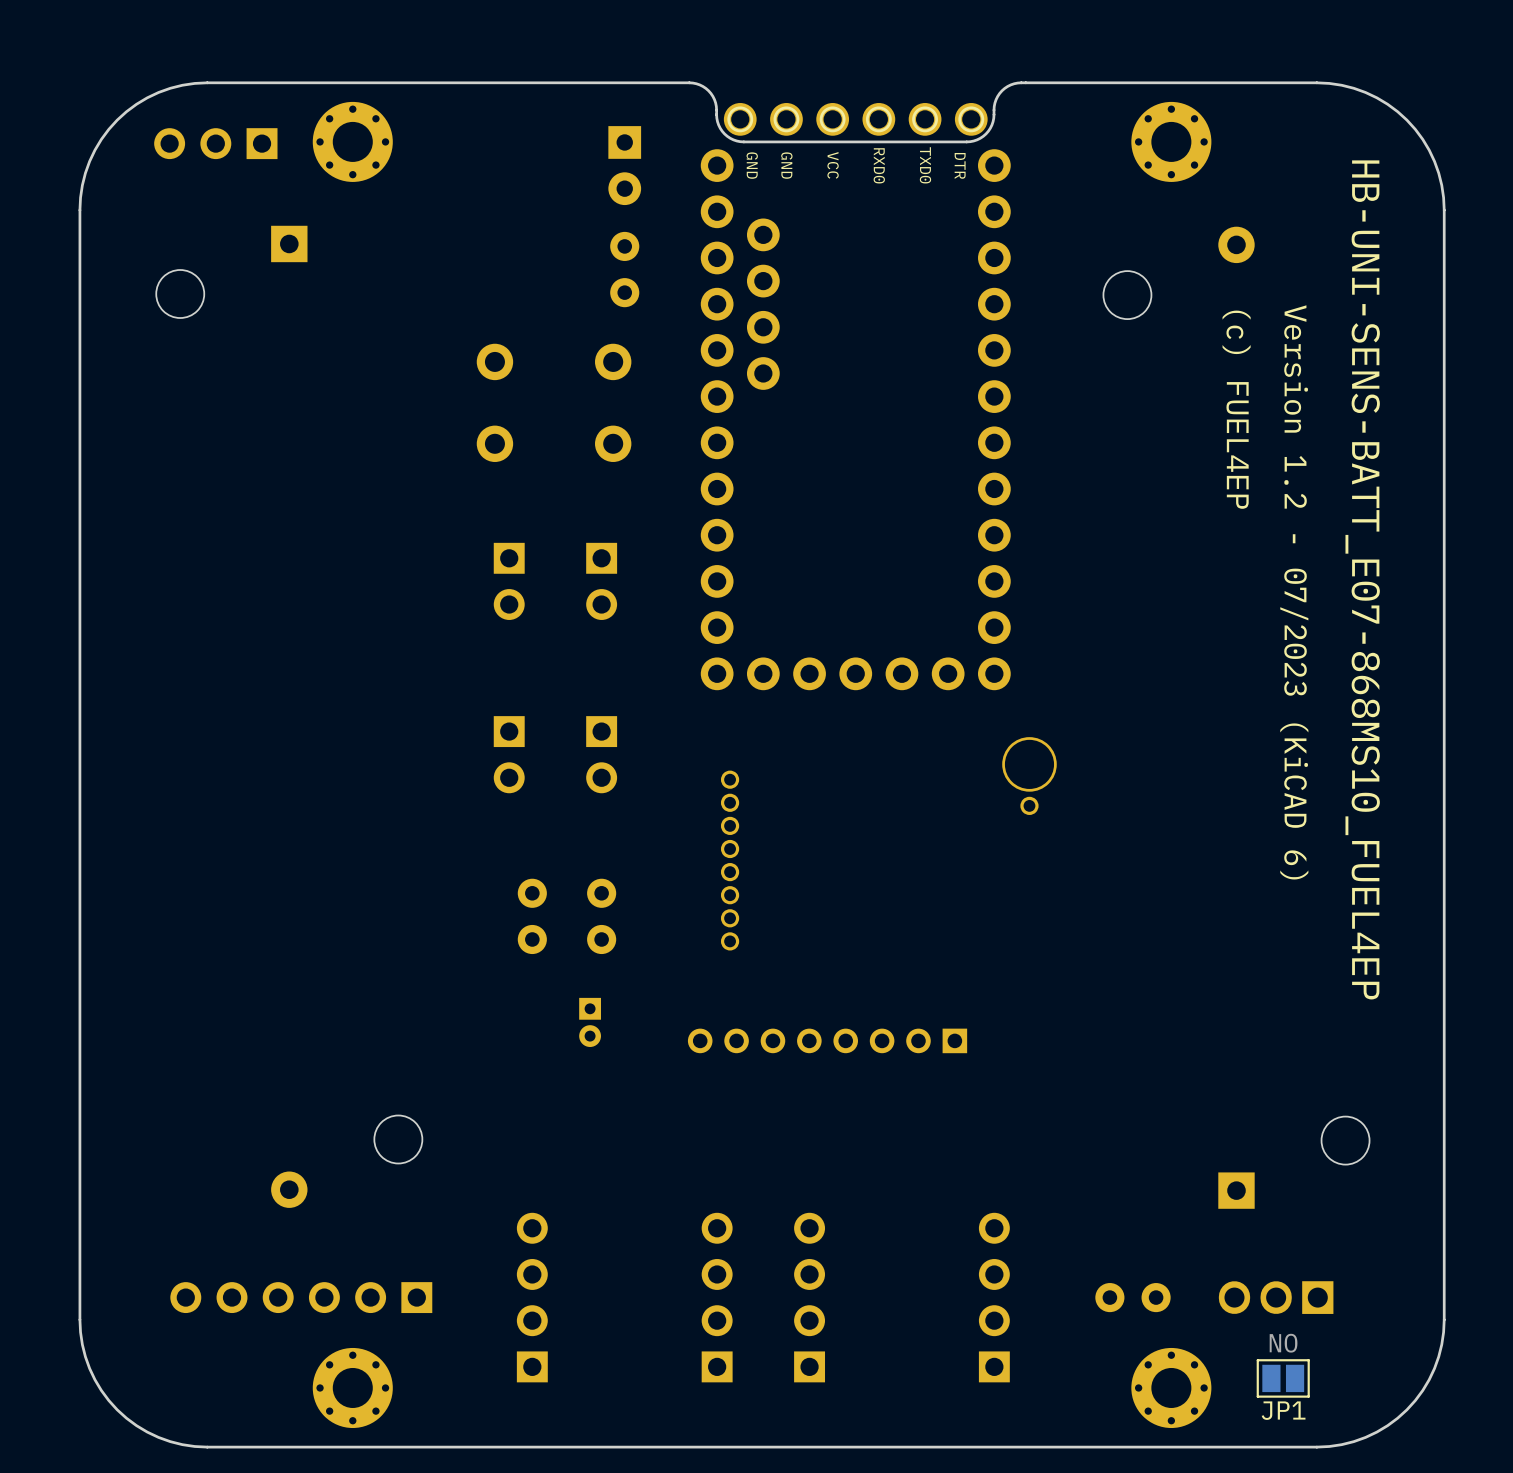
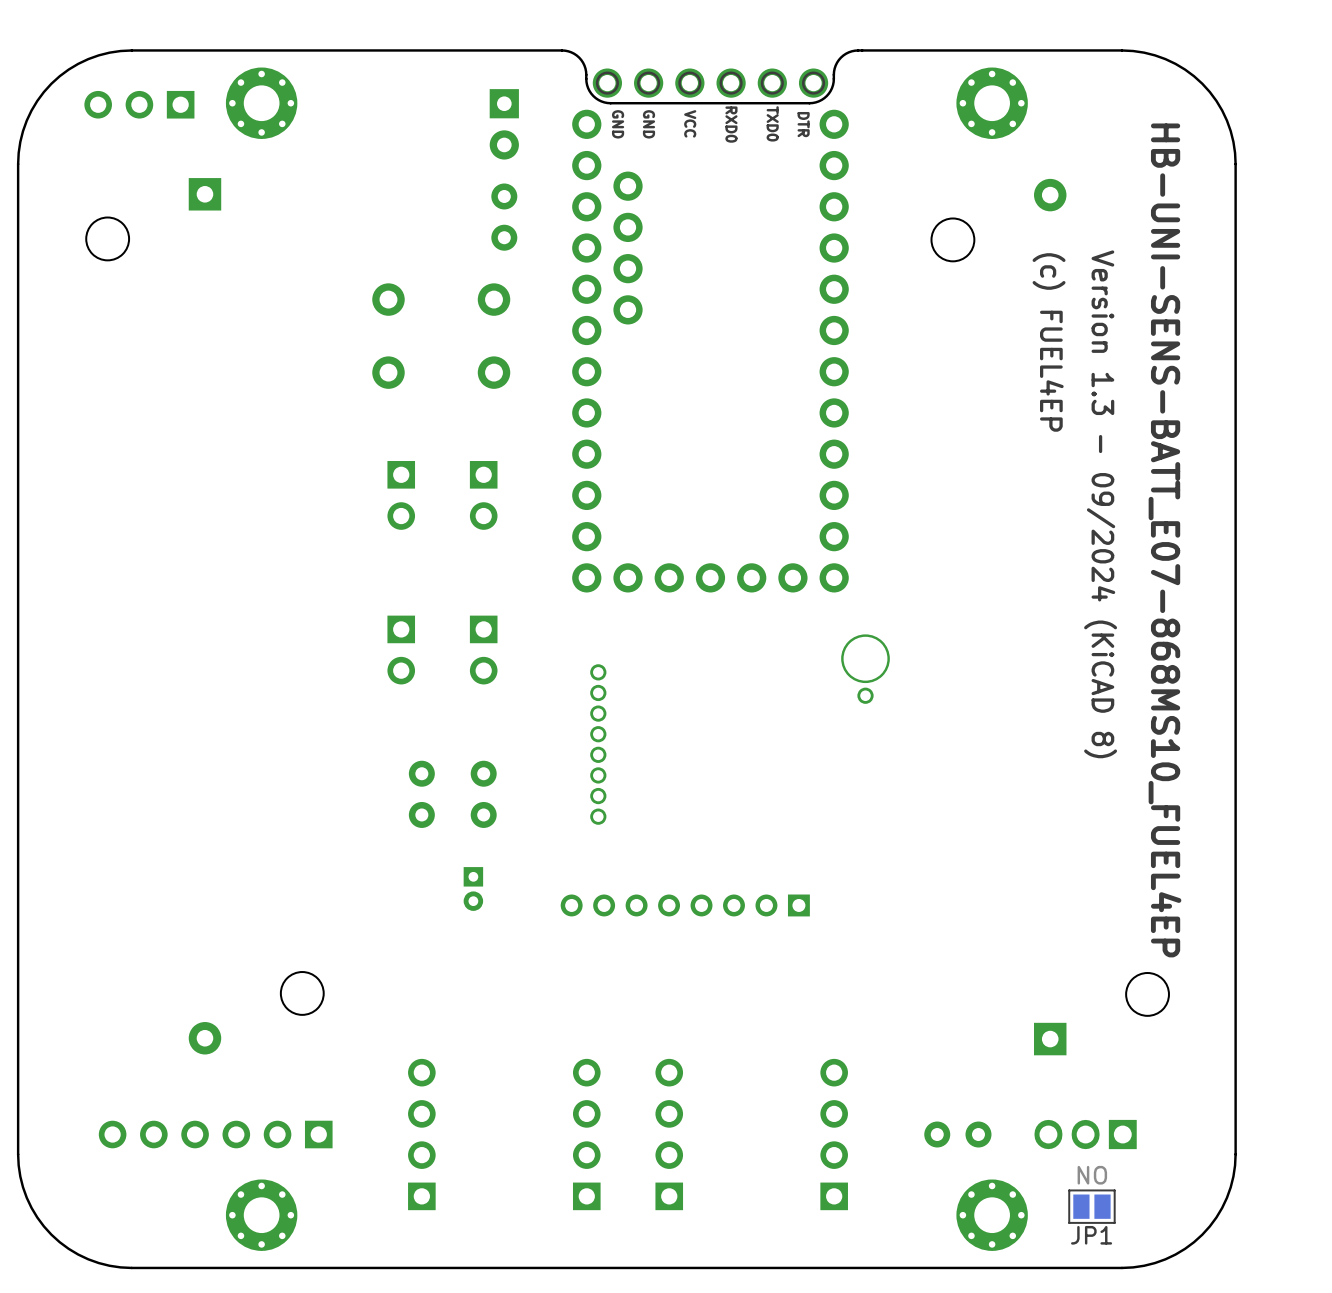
text: Version 1.2 - 07/2023 (KiCAD 6) (1294, 592) -> Version 1.3 - 09/2024 (KiCAD 8) (1100, 504)

